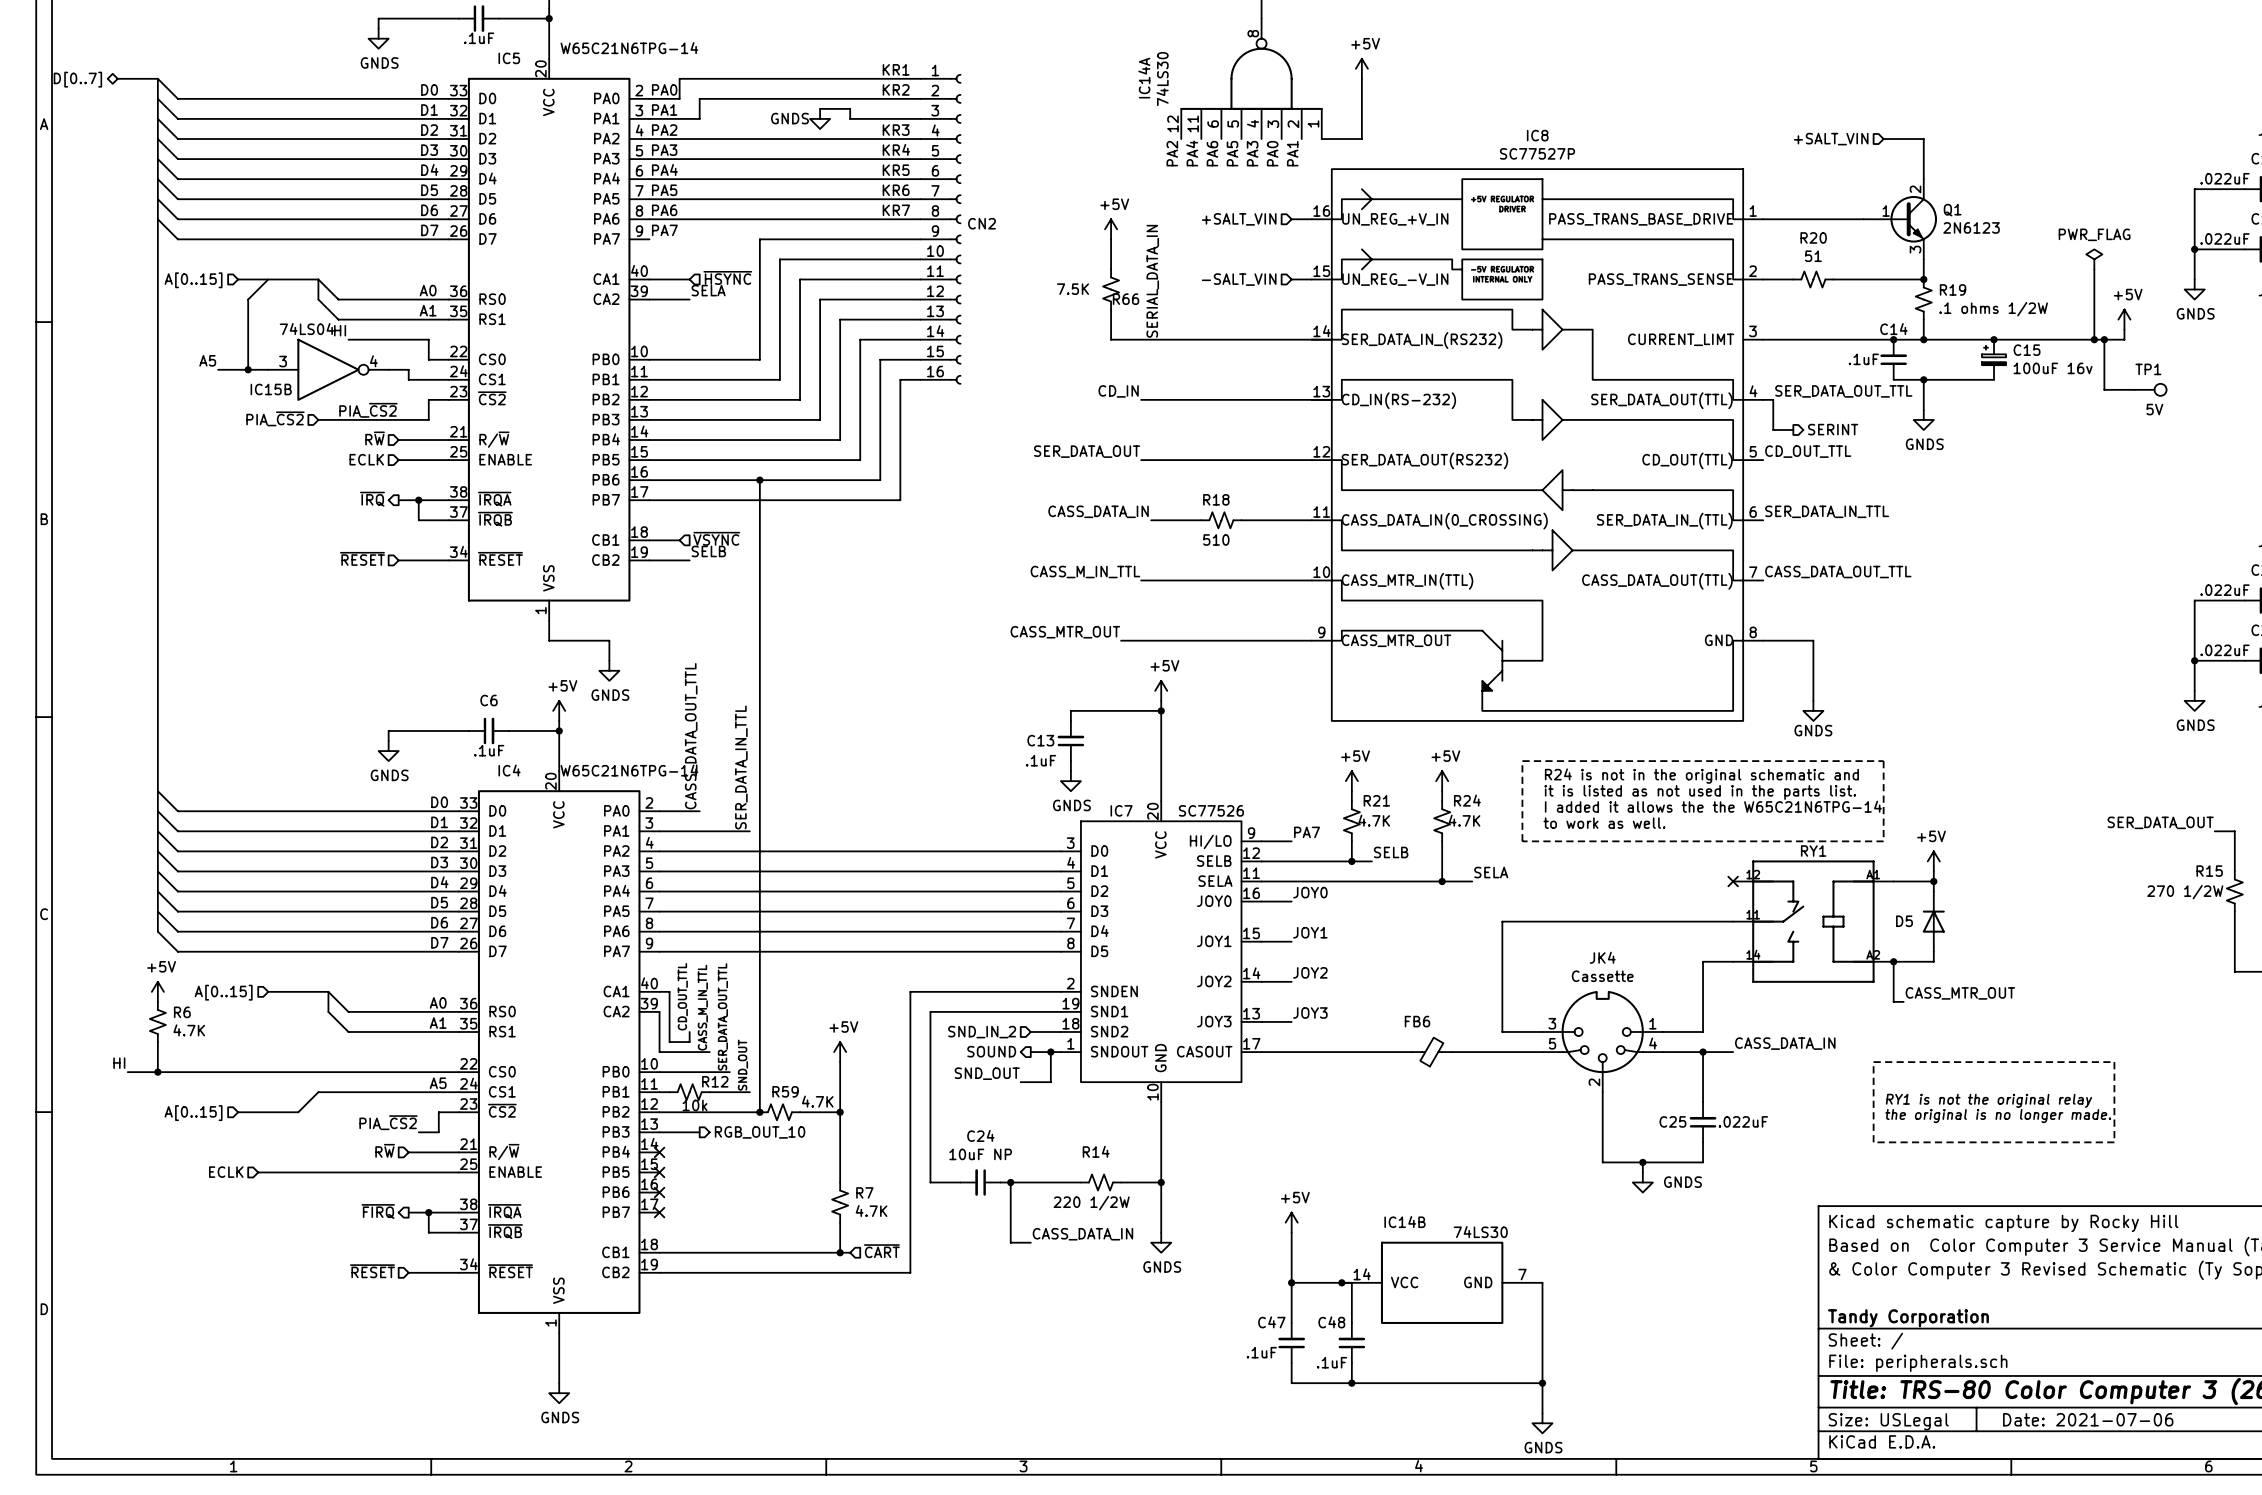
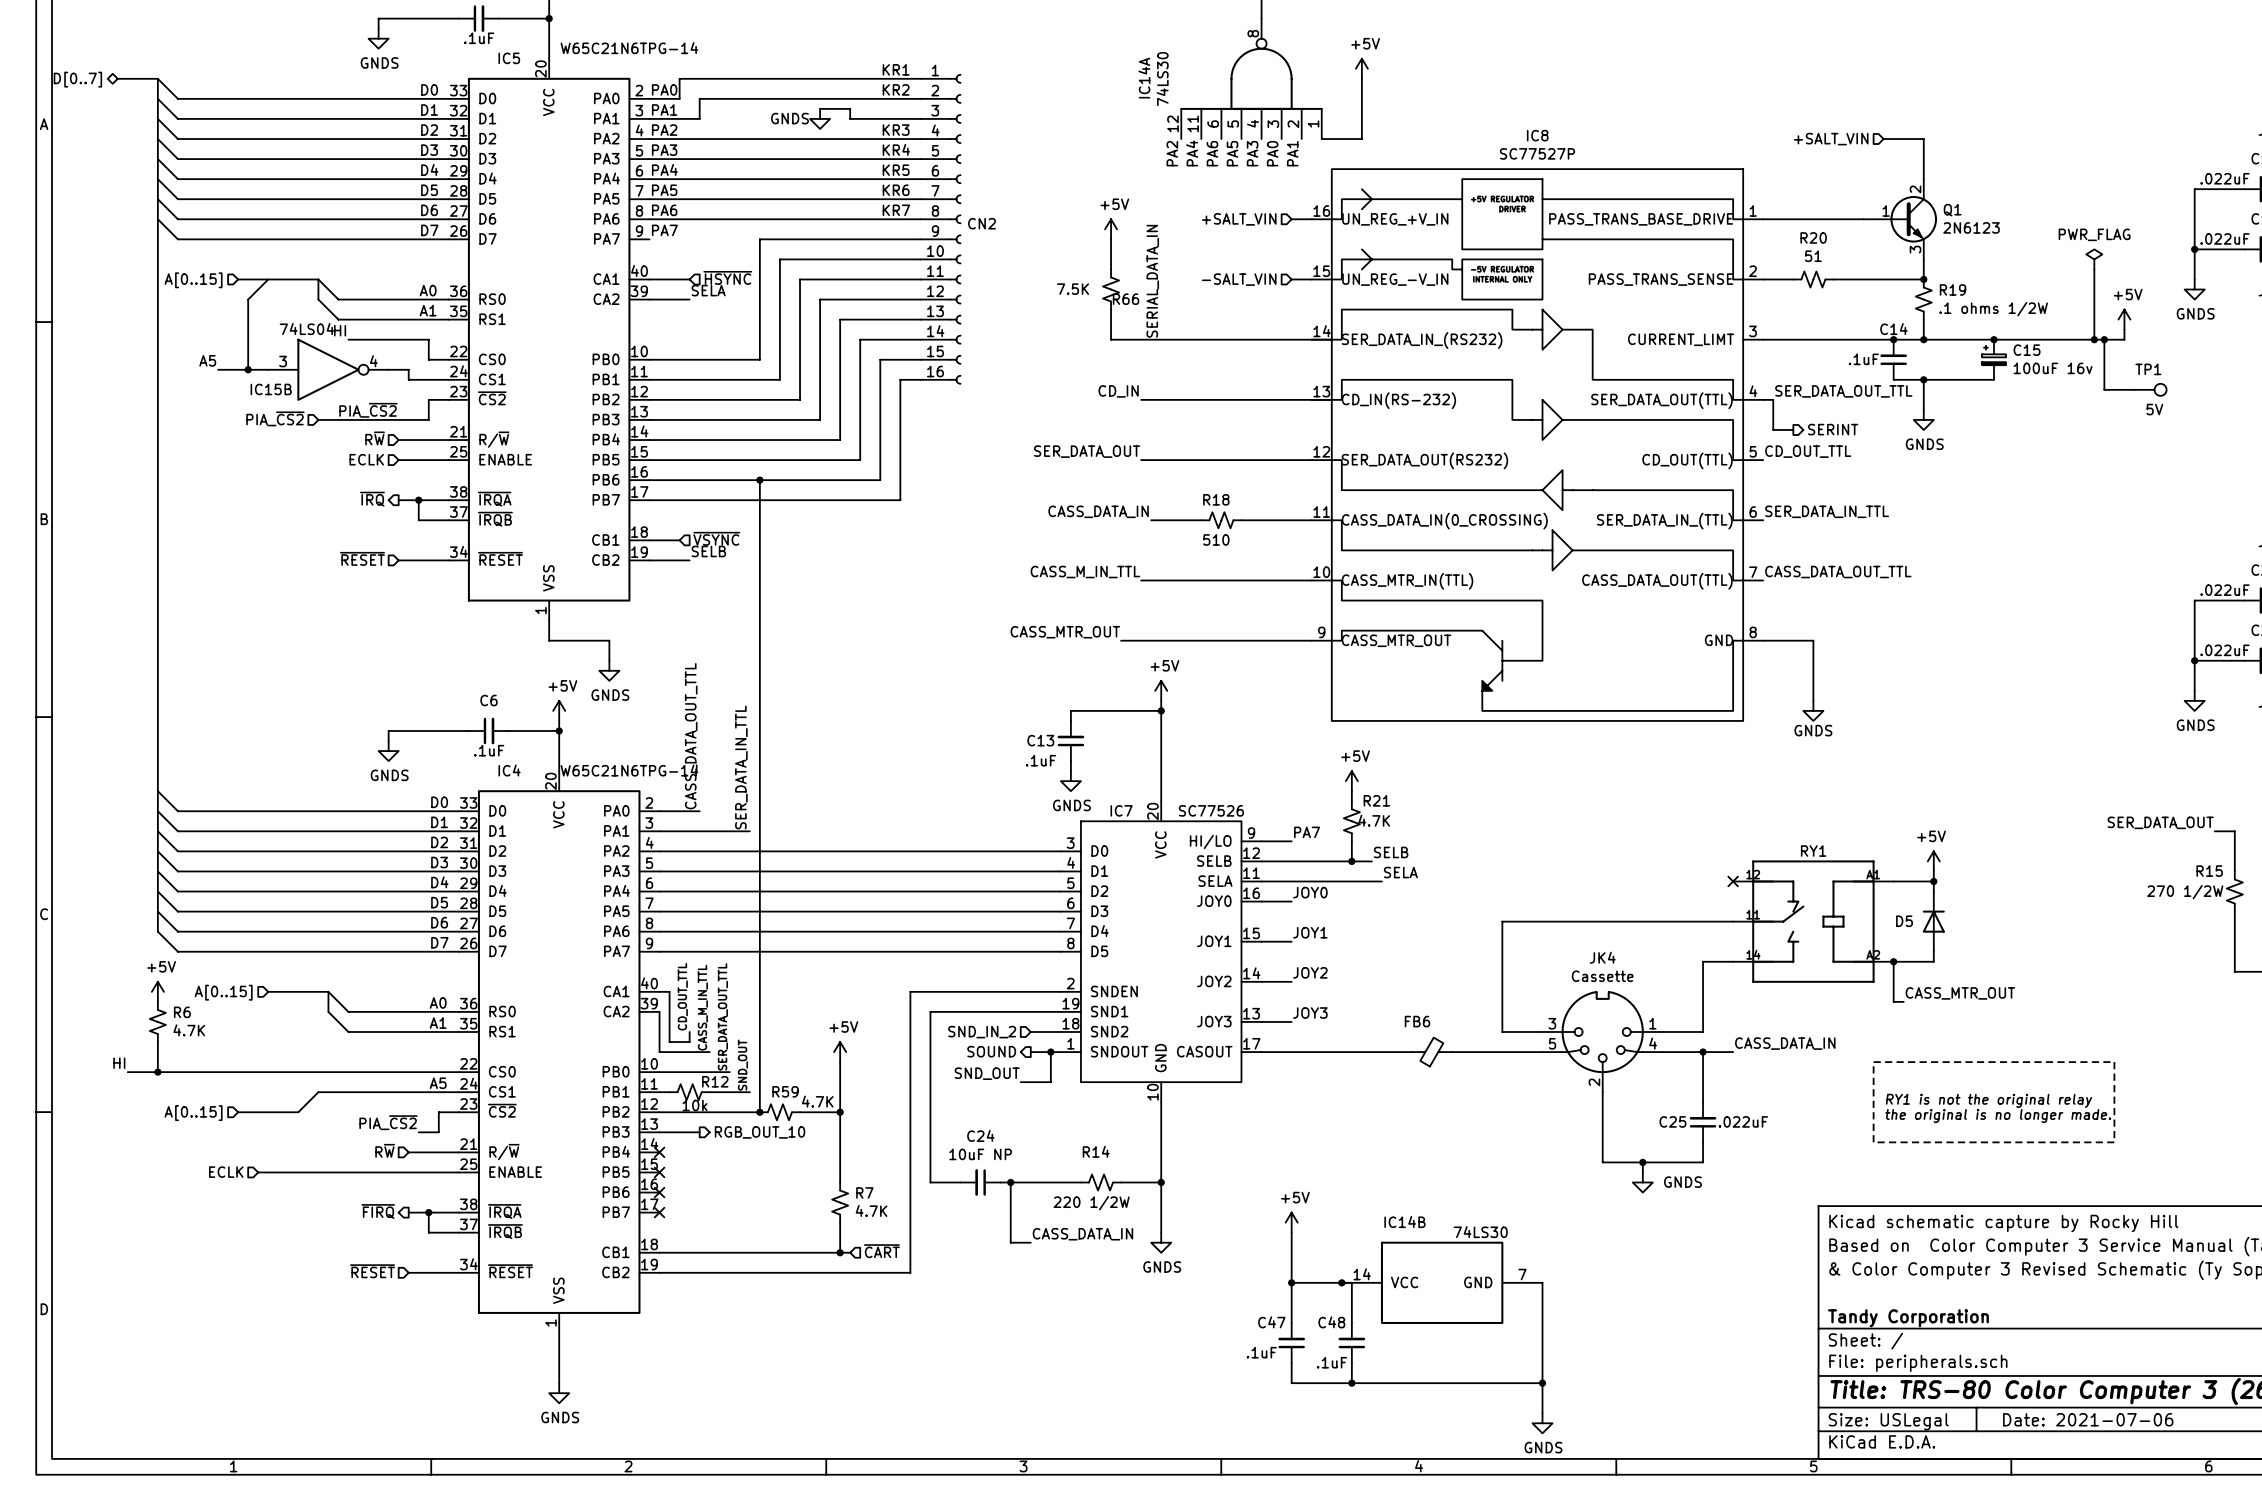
line: (1522, 761) (1522, 841) (1883, 841) (1883, 761) (1522, 761) -> none
text: R24 is not in the original schematic and (1701, 776) -> none
power symbol: +5V (1442, 781) -> none
wire: (1442, 791) (1442, 801) -> none
text: it is listed as not used in the parts list. (1700, 792) -> none
text: I added it allows the the W65C21N6TPG-14 (1713, 806) -> none
R24: 4.7K (1442, 821) -> none
text: to work as well. (1604, 823) -> none
wire: (1442, 841) (1442, 881) -> none
label position: SELA (1491, 872) -> SELA (1400, 872)
wire: (1381, 881) (1472, 881) -> none
junction: (1442, 881) -> none

